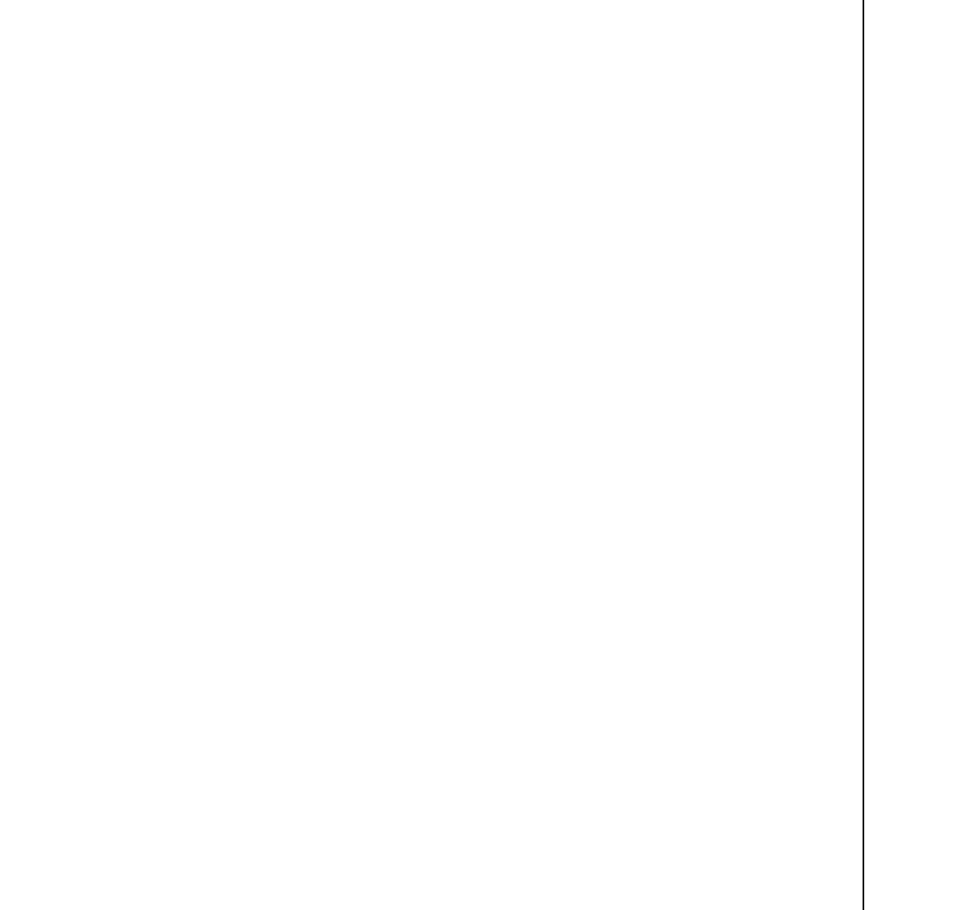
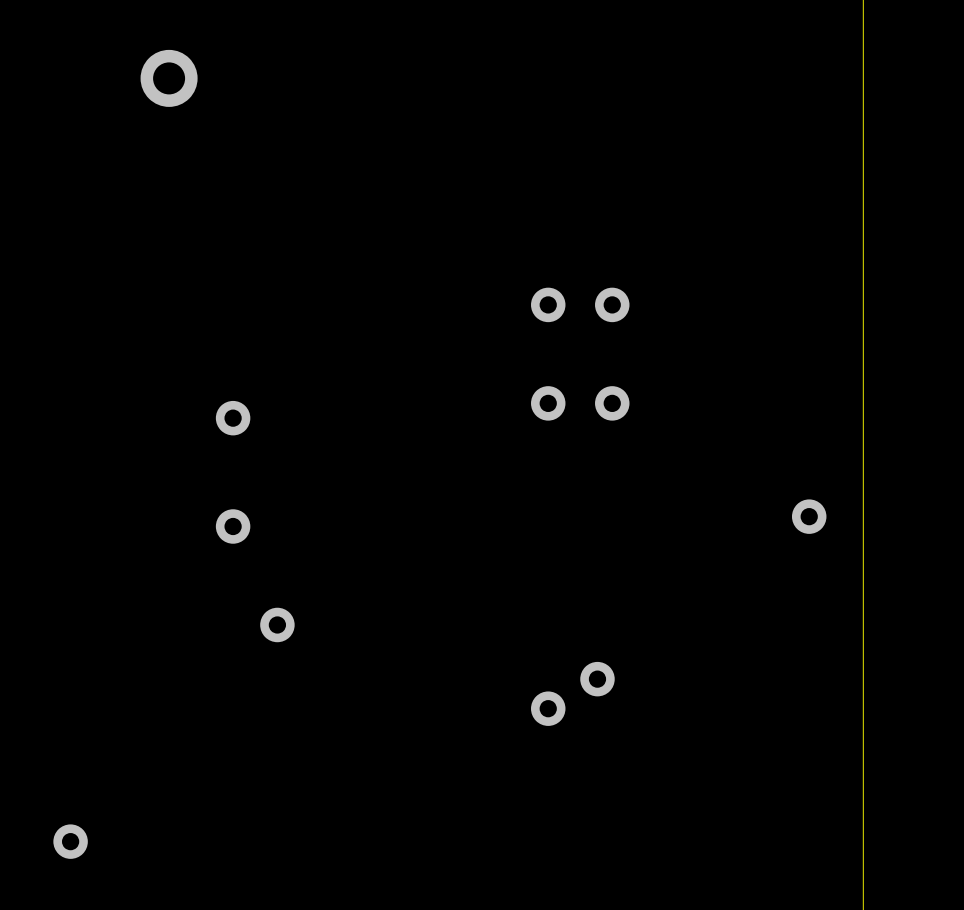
via: none -> (169, 78)
via: none -> (548, 304)
via: none -> (612, 304)
via: none -> (548, 403)
via: none -> (612, 403)
via: none -> (233, 418)
via: none -> (809, 516)
via: none -> (233, 526)
via: none -> (277, 624)
via: none -> (597, 679)
via: none -> (548, 708)
via: none -> (70, 841)

